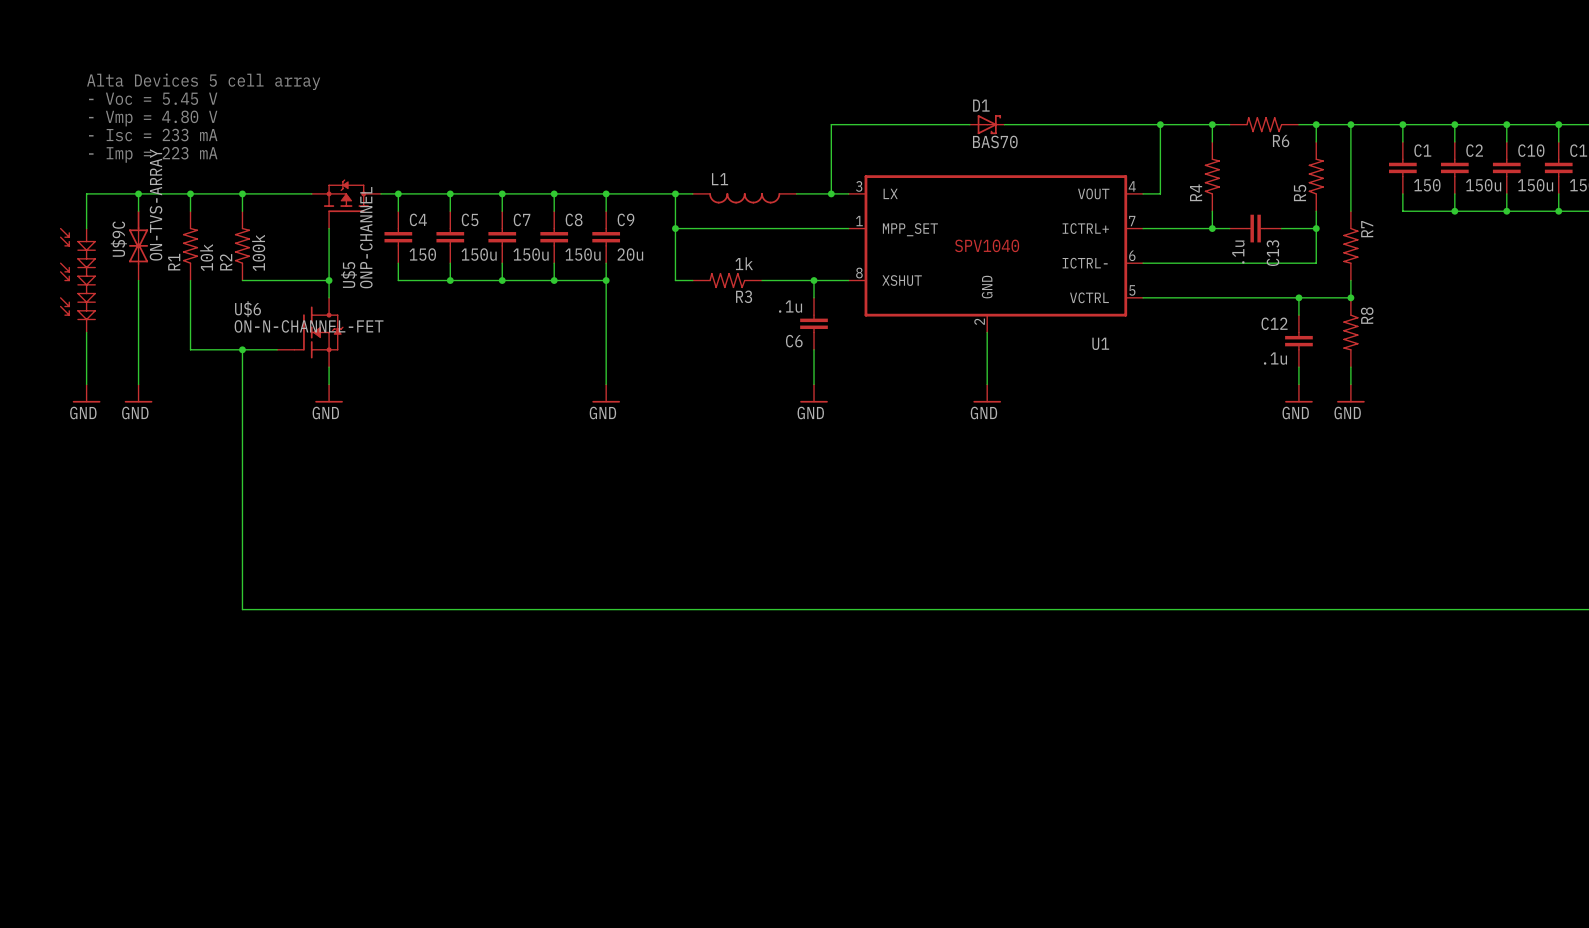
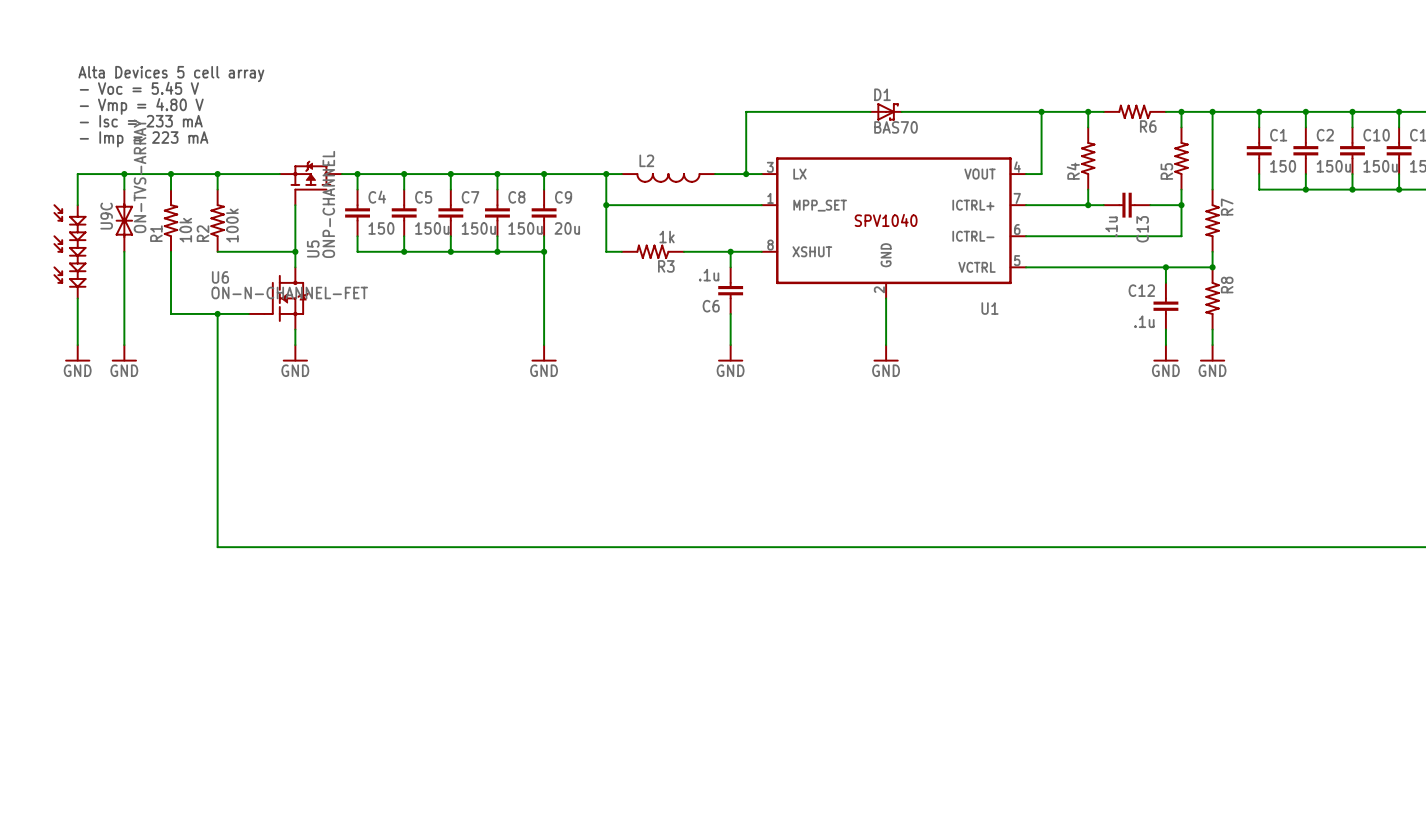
L1 name: L1 (720, 179) -> L2 (646, 160)
U$9C name: U$9C (118, 239) -> U9C (106, 216)
U$5 name: U$5 (348, 275) -> U5 (313, 248)
U$6 name: U$6 (248, 309) -> U6 (220, 277)

